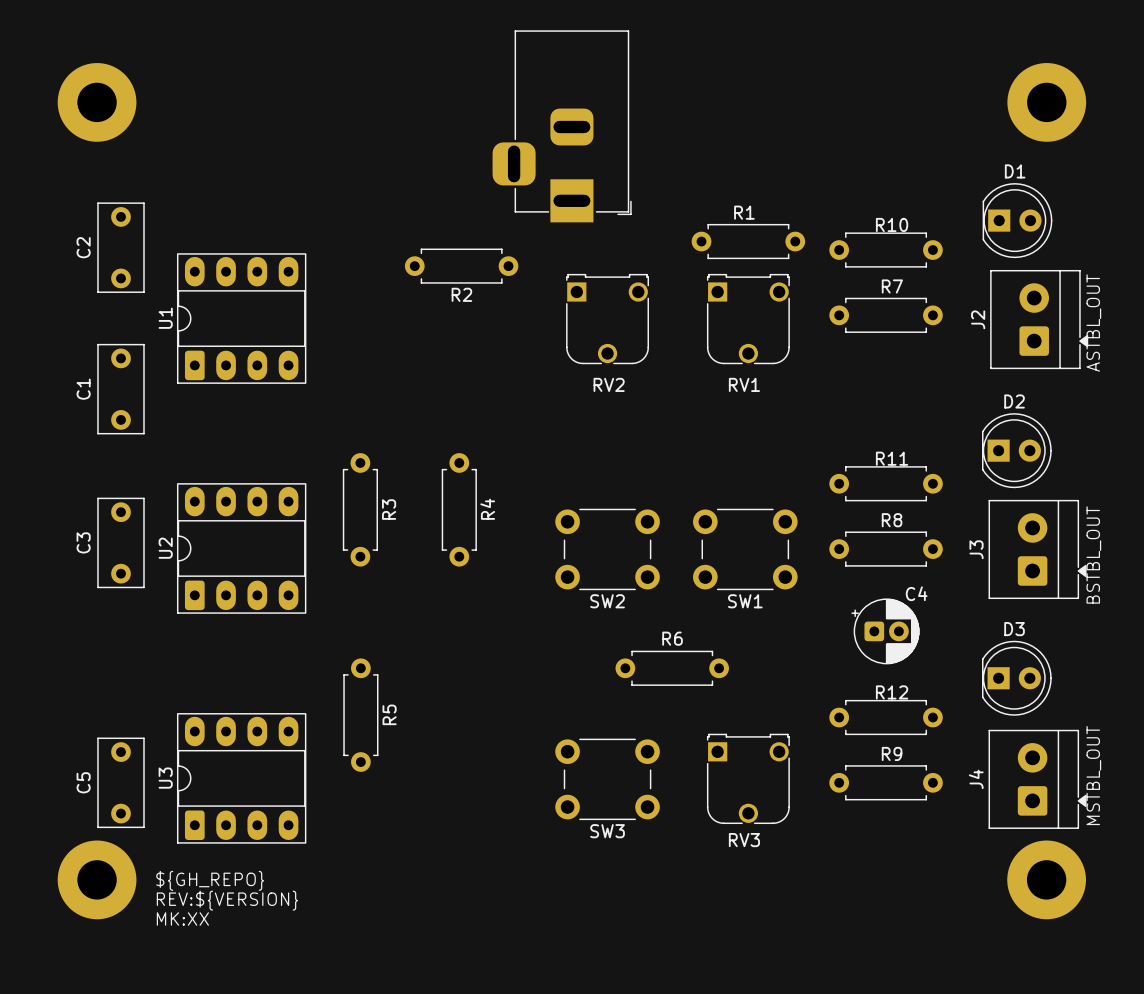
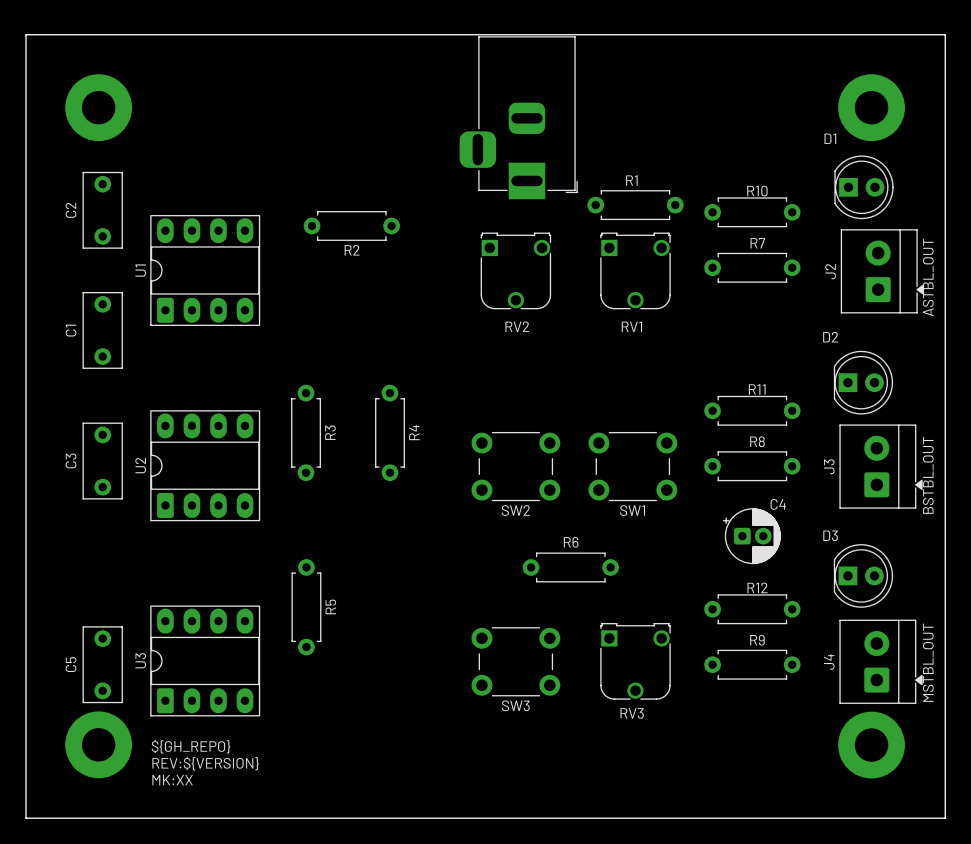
board edge: none -> (26, 34) (945, 34) (945, 818) (26, 818) (26, 34)
part position: (97, 102) -> (98, 107)
part position: (1046, 102) -> (871, 107)
part position: (562, 126) -> (518, 117)
D1 name position: D1 (1015, 171) -> D1 (830, 138)
R2 position: (461, 266) -> (351, 225)
D2 name position: D2 (1014, 401) -> D2 (830, 337)
D3 name position: D3 (1014, 629) -> D3 (830, 535)
part position: (97, 879) -> (98, 744)
part position: (1046, 879) -> (871, 745)
text position: ${GH_REPO} (210, 880) -> ${GH_REPO} (191, 746)
text position: REV:${VERSION} (227, 900) -> REV:${VERSION} (205, 763)
text position: MK:XX (182, 918) -> MK:XX (172, 780)

